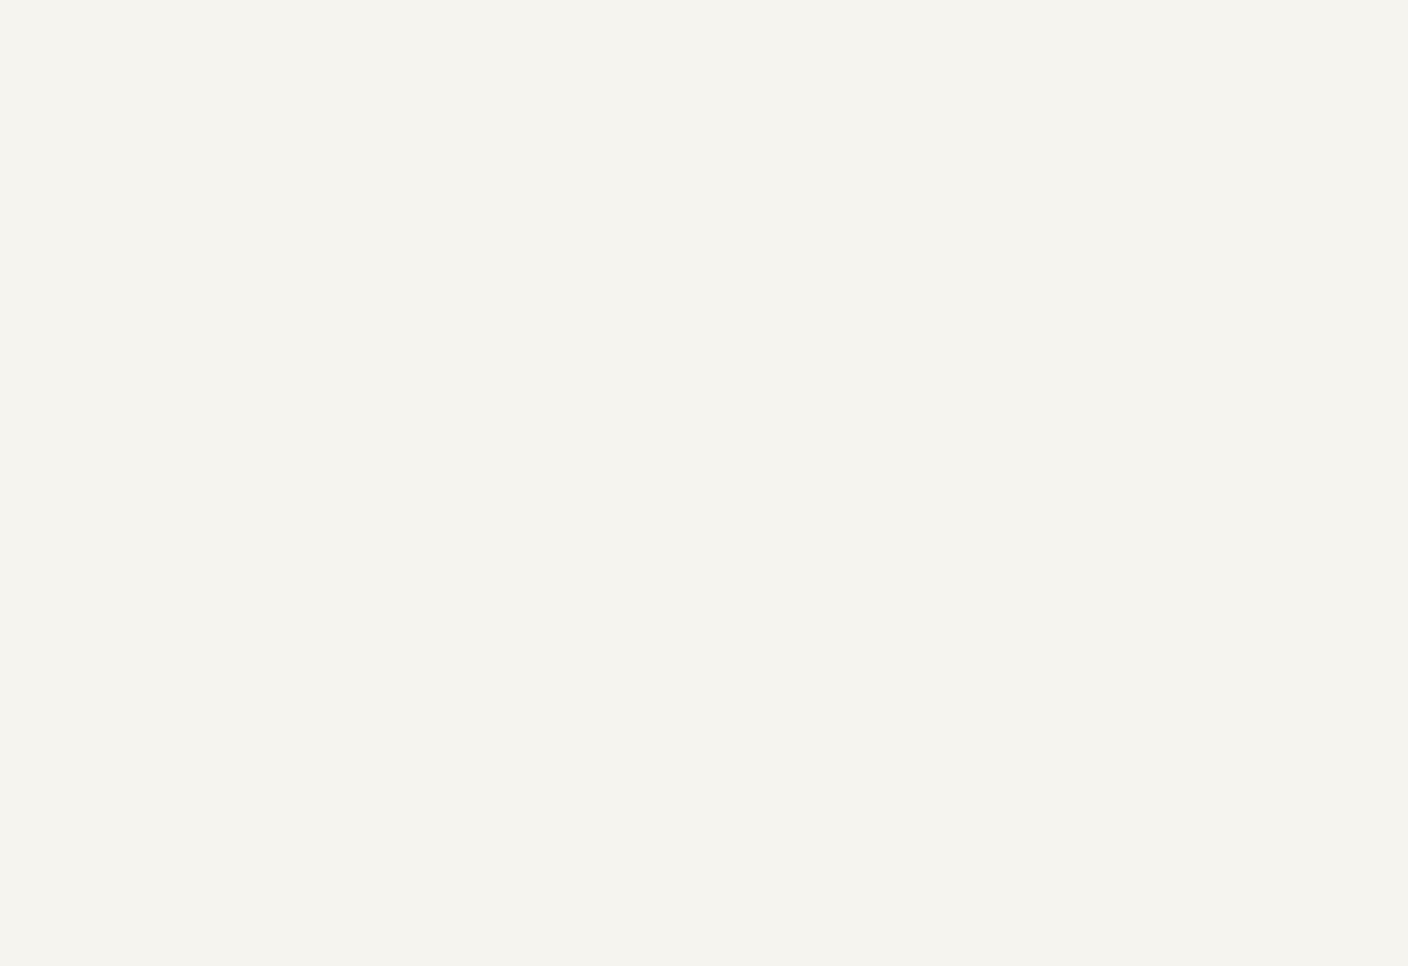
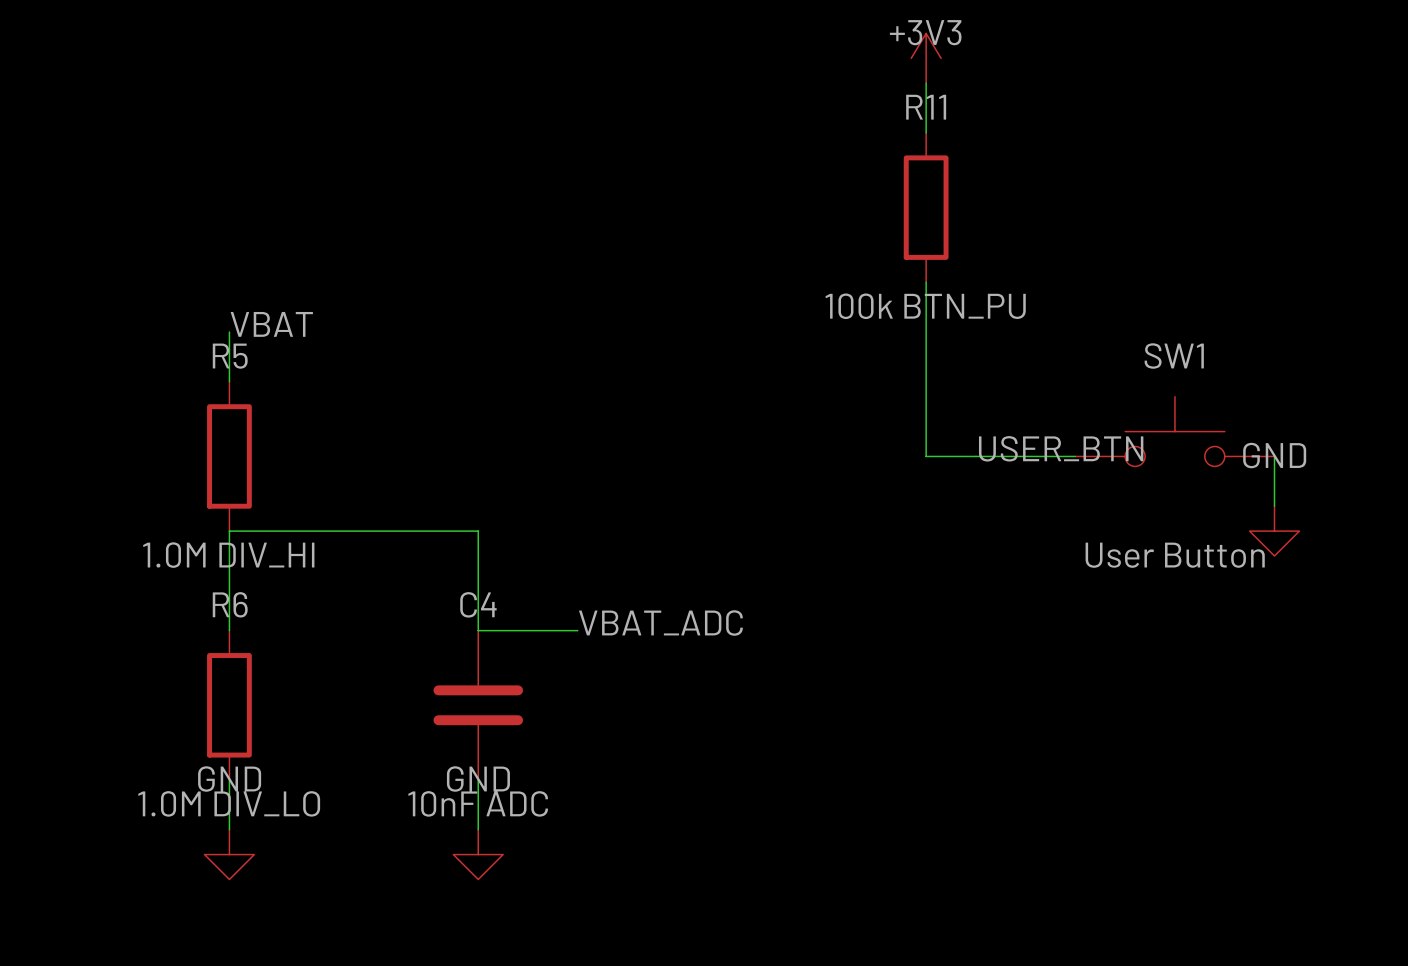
power symbol: none -> +3V3 (926, 58)
wire: none -> (926, 83) (926, 132)
R11: none -> 100k BTN_PU (926, 207)
wire: none -> (926, 282) (926, 456) (1075, 456)
label: none -> VBAT (271, 324)
wire: none -> (229, 332) (229, 381)
SW1: none -> User Button (1174, 431)
label: none -> USER_BTN (1061, 448)
R5: none -> 1.0M DIV_HI (229, 456)
wire: none -> (1274, 456) (1274, 506)
power symbol: none -> GND (1274, 531)
label: none -> VBAT_ADC (660, 623)
wire: none -> (229, 630) (229, 531) (478, 531) (478, 630) (577, 630)
R6: none -> 1.0M DIV_LO (229, 705)
C4: none -> 10nF ADC (478, 705)
wire: none -> (229, 779) (229, 829)
wire: none -> (478, 779) (478, 829)
power symbol: none -> GND (229, 854)
power symbol: none -> GND (478, 854)

